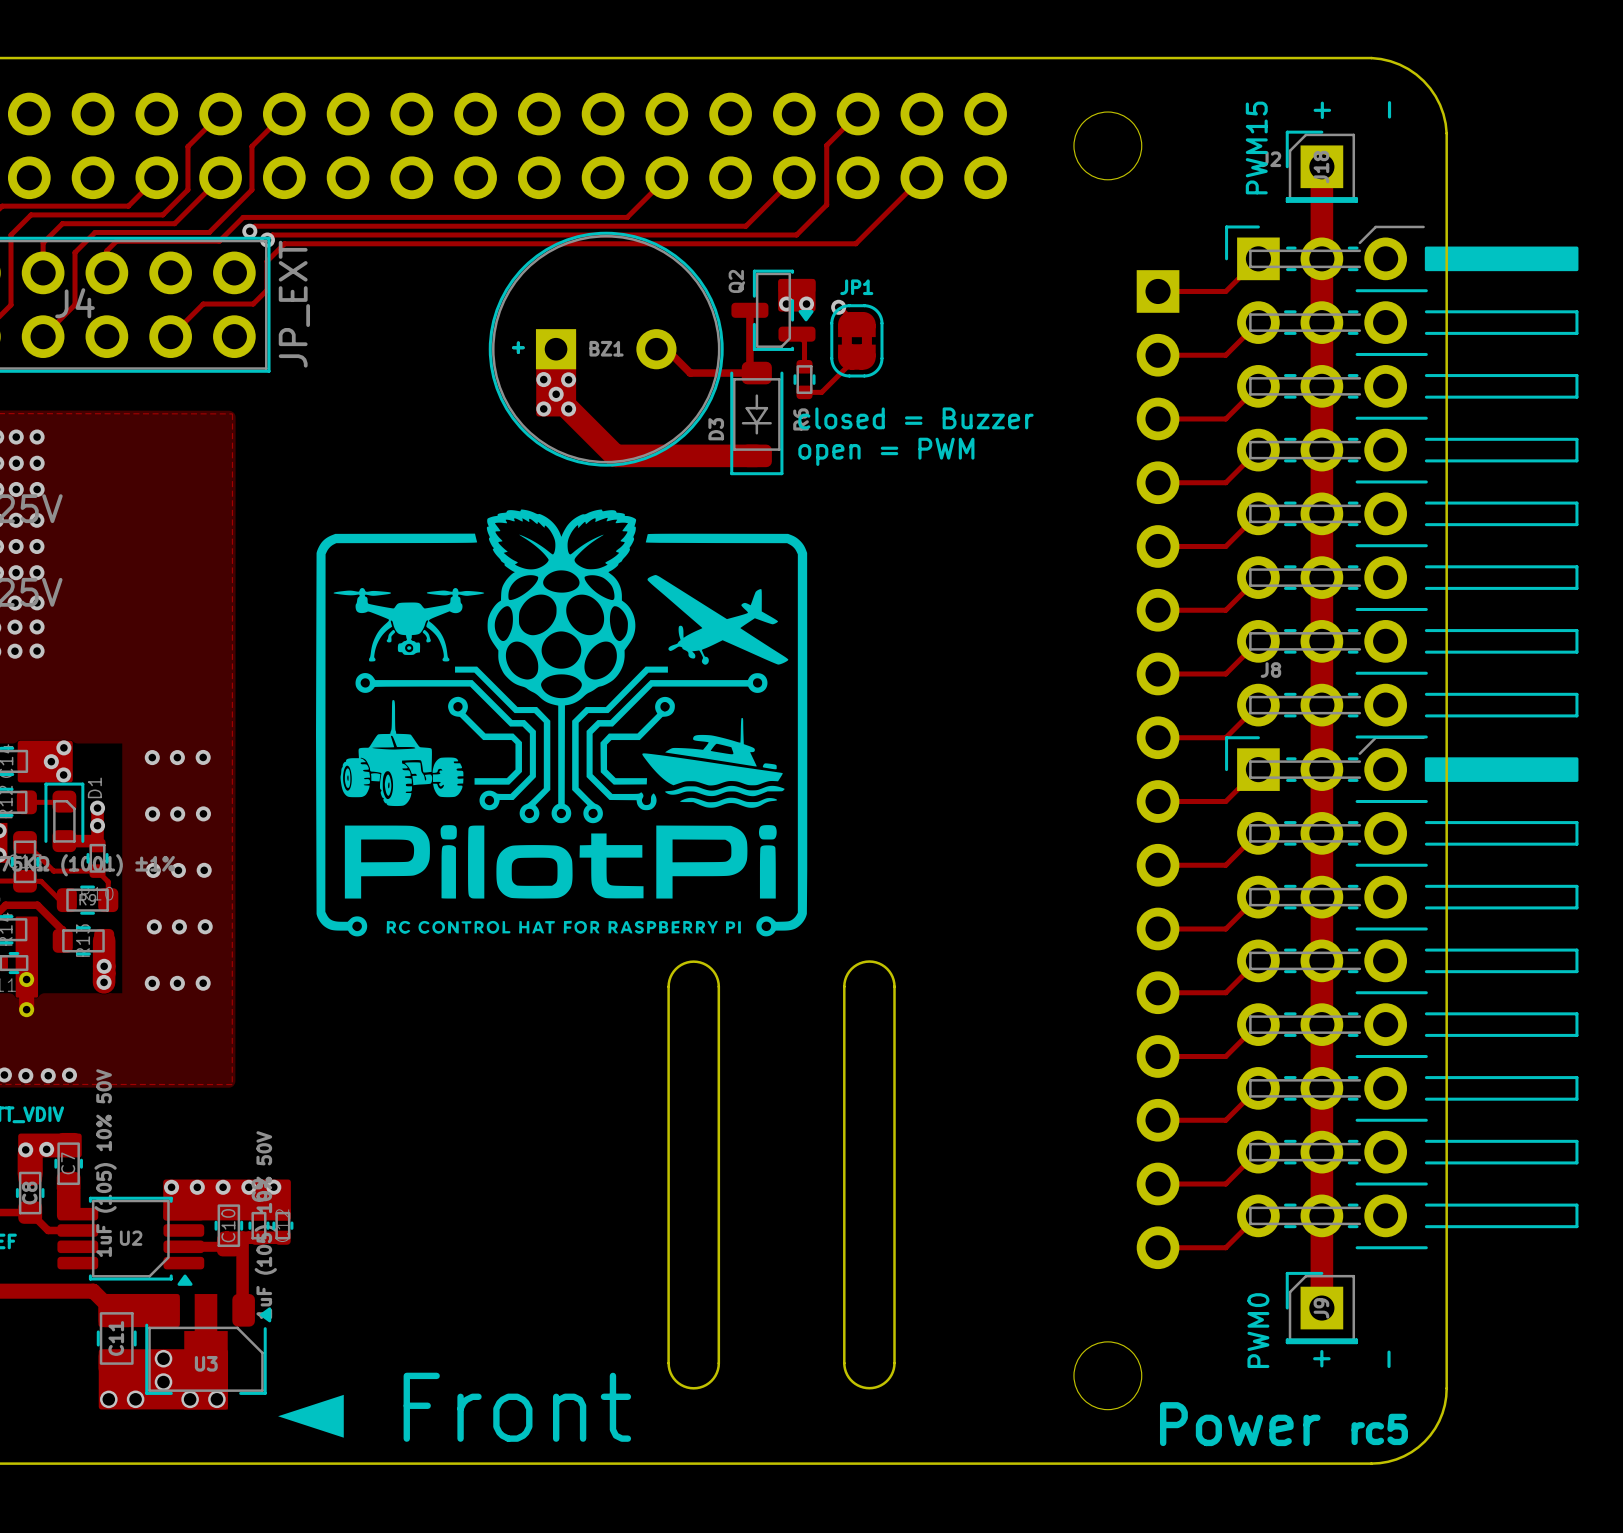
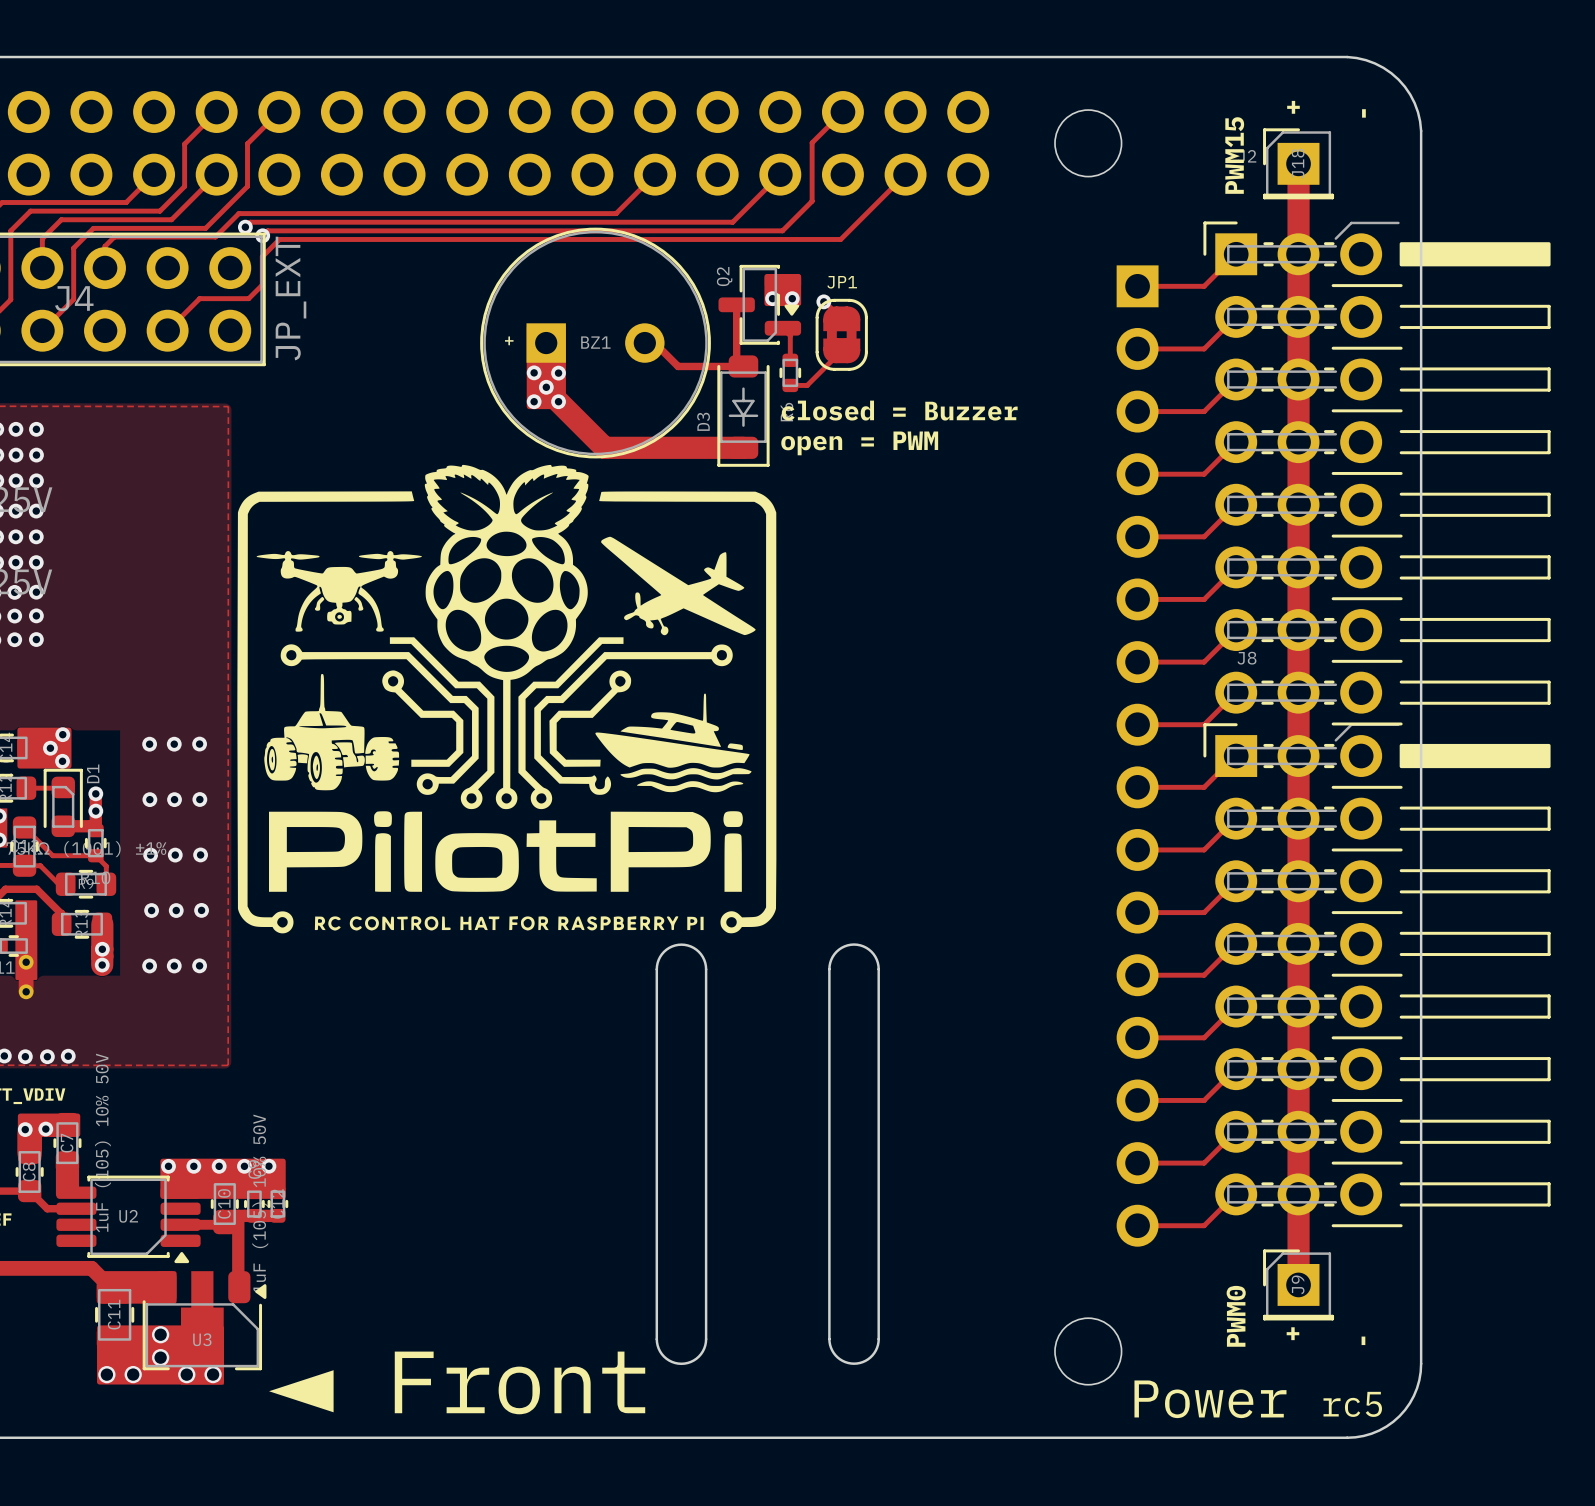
drawing: none -> [237, 464, 777, 934]
drawing: [316, 509, 808, 937] -> none
drawing position: (409, 647) -> (339, 616)
drawing shape: [355, 673, 536, 811] -> [389, 637, 495, 810]
drawing shape: [586, 673, 768, 811] -> [620, 693, 721, 747]
drawing shape: [600, 696, 675, 785] -> [534, 644, 733, 795]
drawing shape: [418, 920, 430, 934] -> [411, 916, 422, 931]
drawing shape: [432, 920, 446, 934] -> [424, 916, 439, 931]
drawing shape: [448, 921, 459, 934] -> [441, 916, 451, 931]
drawing shape: [519, 921, 530, 934] -> [509, 916, 518, 931]
drawing shape: [532, 921, 545, 934] -> [520, 916, 535, 931]
drawing shape: [545, 921, 555, 934] -> [538, 916, 549, 931]

